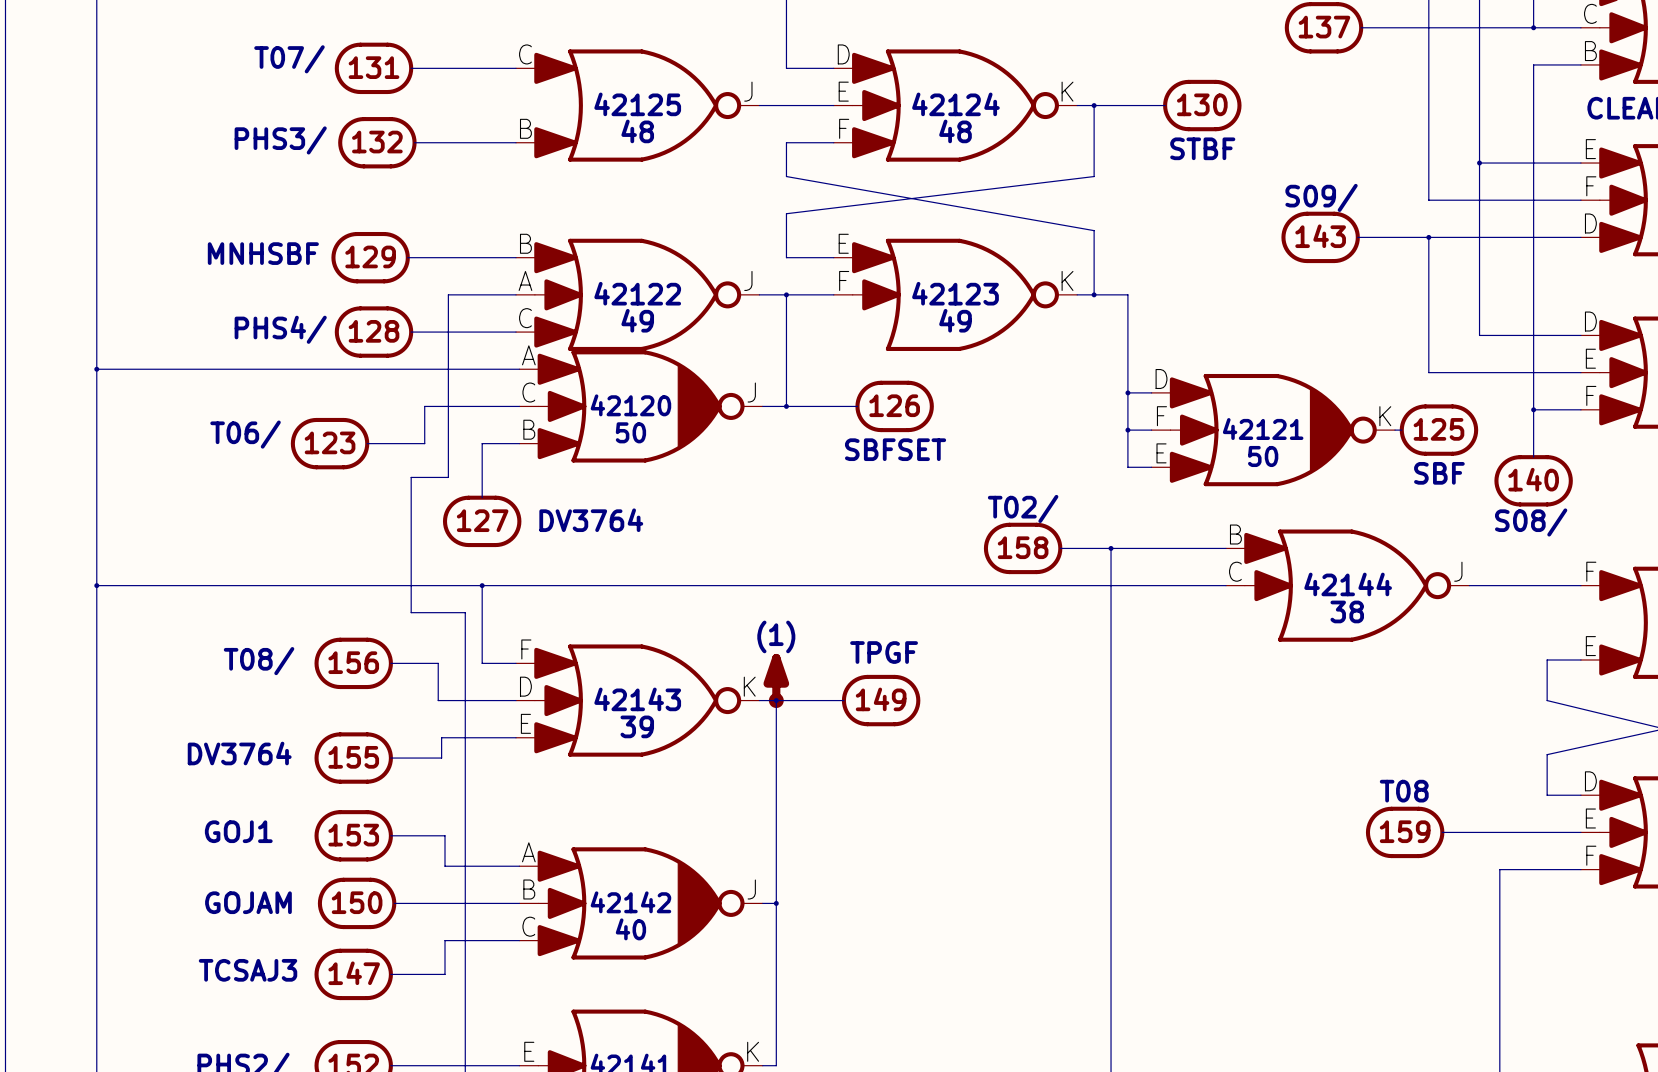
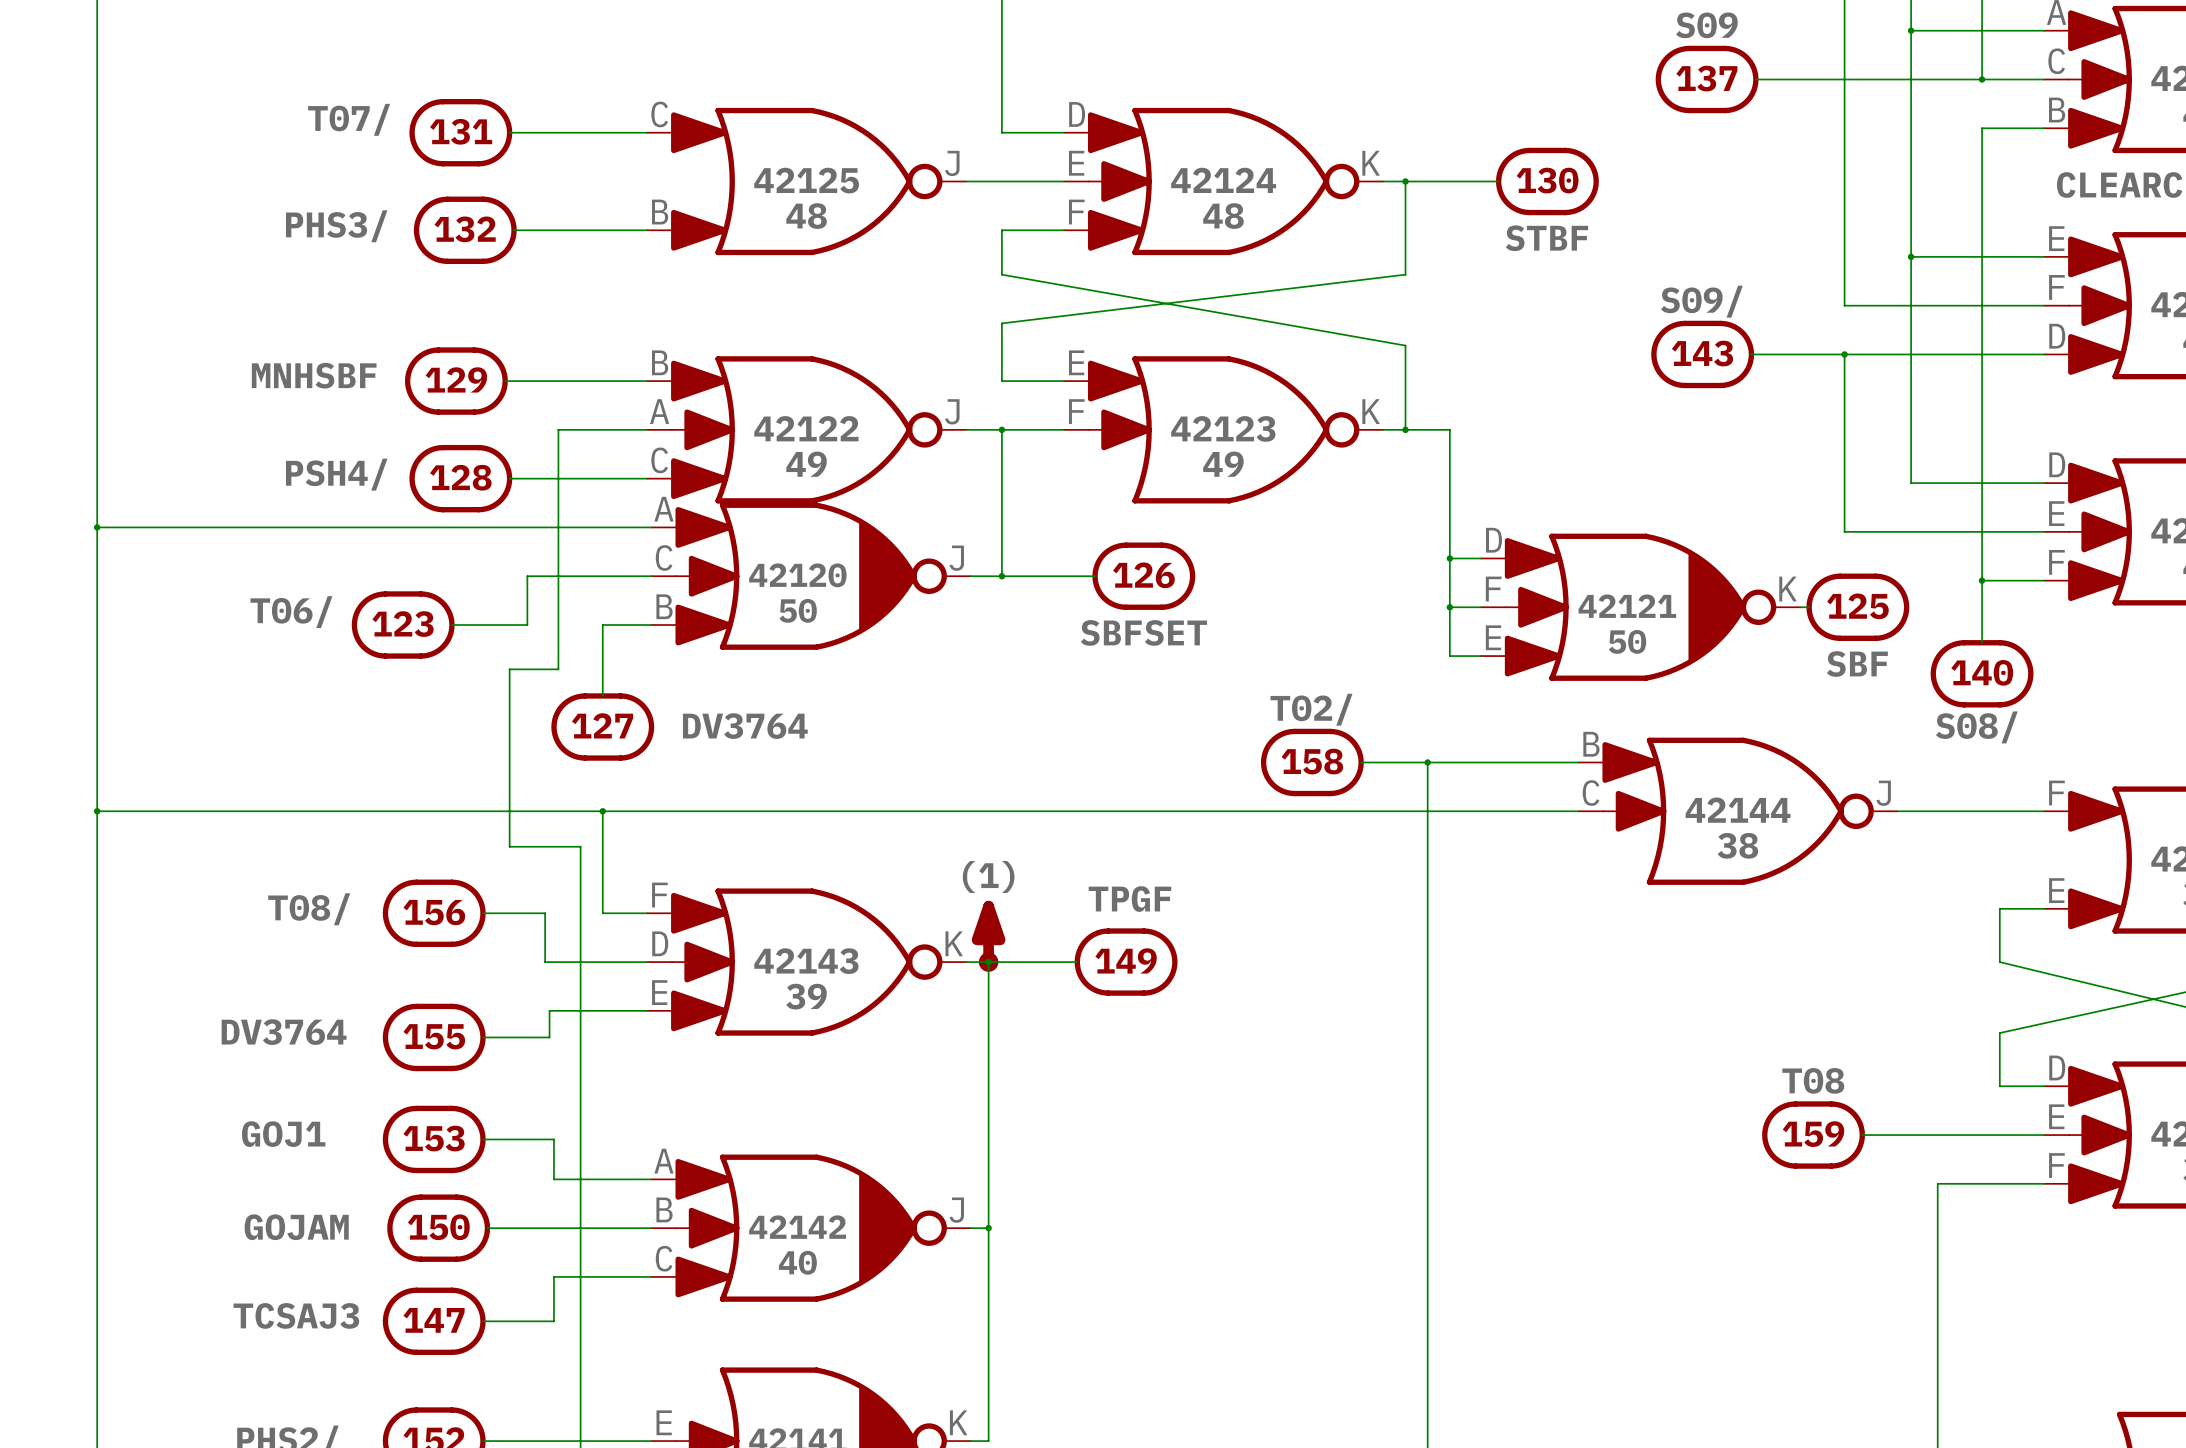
part text: PHS4/ (280, 329) -> PSH4/ (336, 474)

